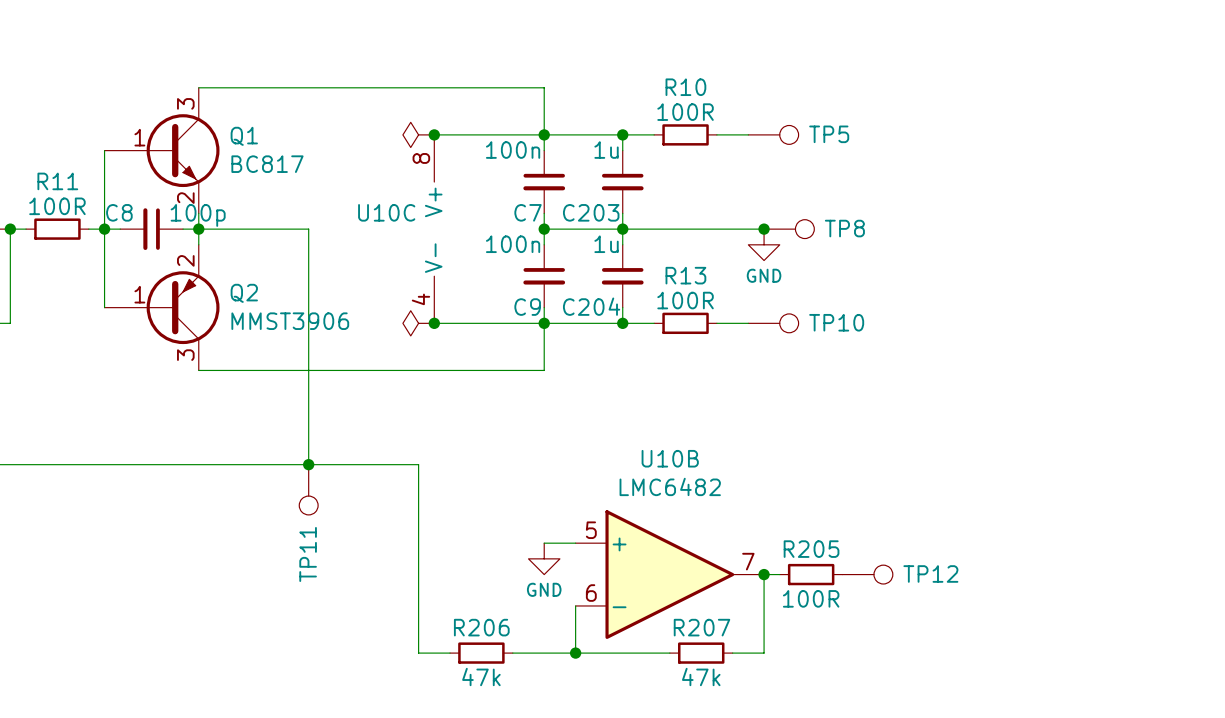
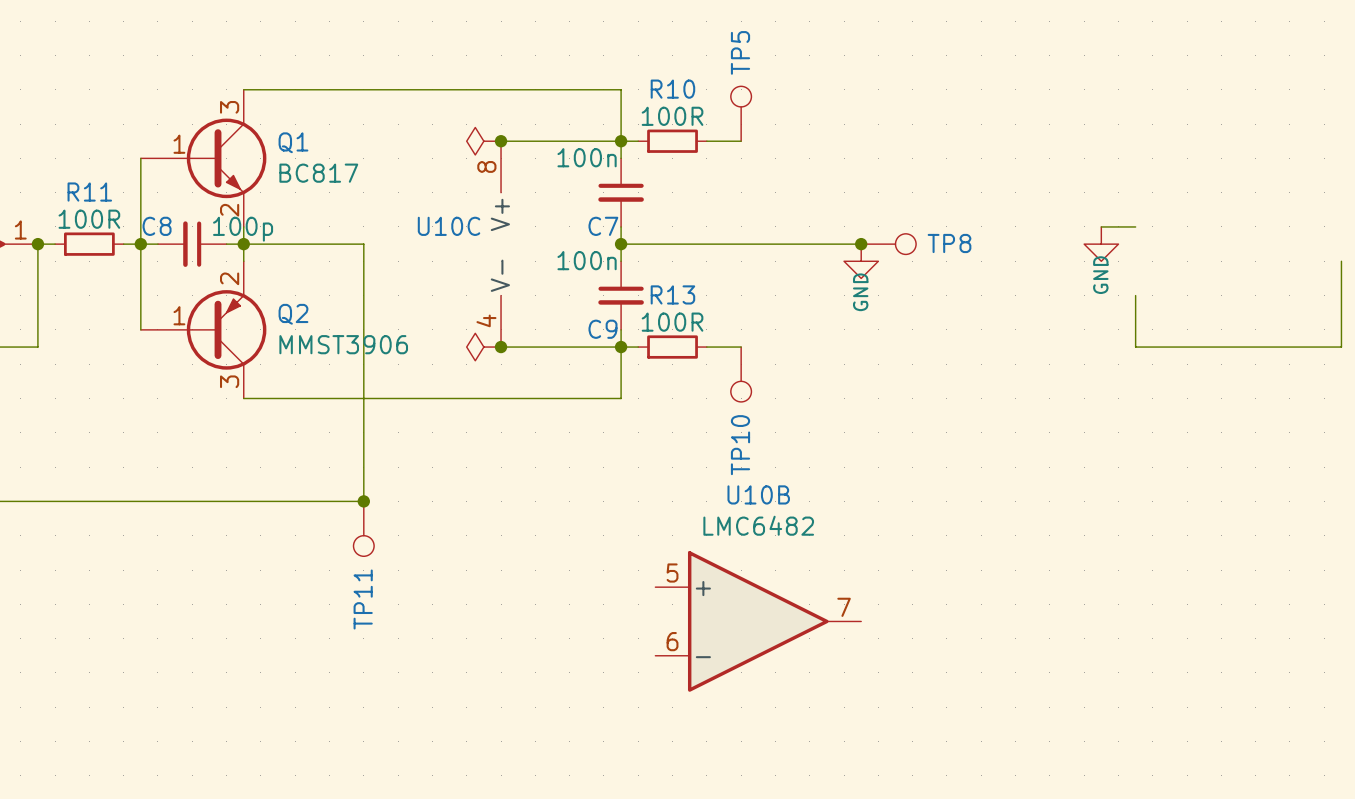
wire: (559, 134) (622, 134) (622, 150) -> none
junction: (622, 134) -> none
R10 position: (685, 134) -> (672, 141)
wire: (716, 134) (748, 134) -> (1101, 226) (1135, 226)
TP5 position: (773, 134) -> (741, 113)
TP5 rotation: 0° (789, 134) -> 90° counterclockwise (741, 96)
C203: 1u (622, 182) -> none
wire: (622, 213) (622, 244) -> none
junction: (622, 229) -> none
power symbol: none -> GND (1101, 244)
wire: none -> (1341, 261) (1341, 347) (1135, 347) (1135, 295)
power symbol text rotation: 0° (764, 275) -> 90° counterclockwise (860, 292)
C204: 1u (622, 276) -> none
wire: (622, 307) (622, 323) (559, 323) -> none
junction: (622, 323) -> none
R13 position: (685, 323) -> (672, 347)
wire: (716, 323) (748, 323) -> none
TP10 position: (773, 323) -> (741, 374)
TP10 rotation: 0° (789, 323) -> 90° clockwise (741, 391)
wire: (308, 464) (418, 464) (418, 653) (450, 653) -> none
wire: (544, 543) (575, 543) -> none
power symbol: GND (544, 558) -> none
junction: (764, 574) -> none
wire: (779, 574) (764, 574) (764, 653) (732, 653) -> none
R205: 100R (811, 574) -> none
TP12: (867, 574) -> none
wire: (575, 605) (575, 653) -> none
R206: 47k (481, 653) -> none
wire: (512, 653) (669, 653) -> none
junction: (575, 653) -> none
R207: 47k (701, 653) -> none

